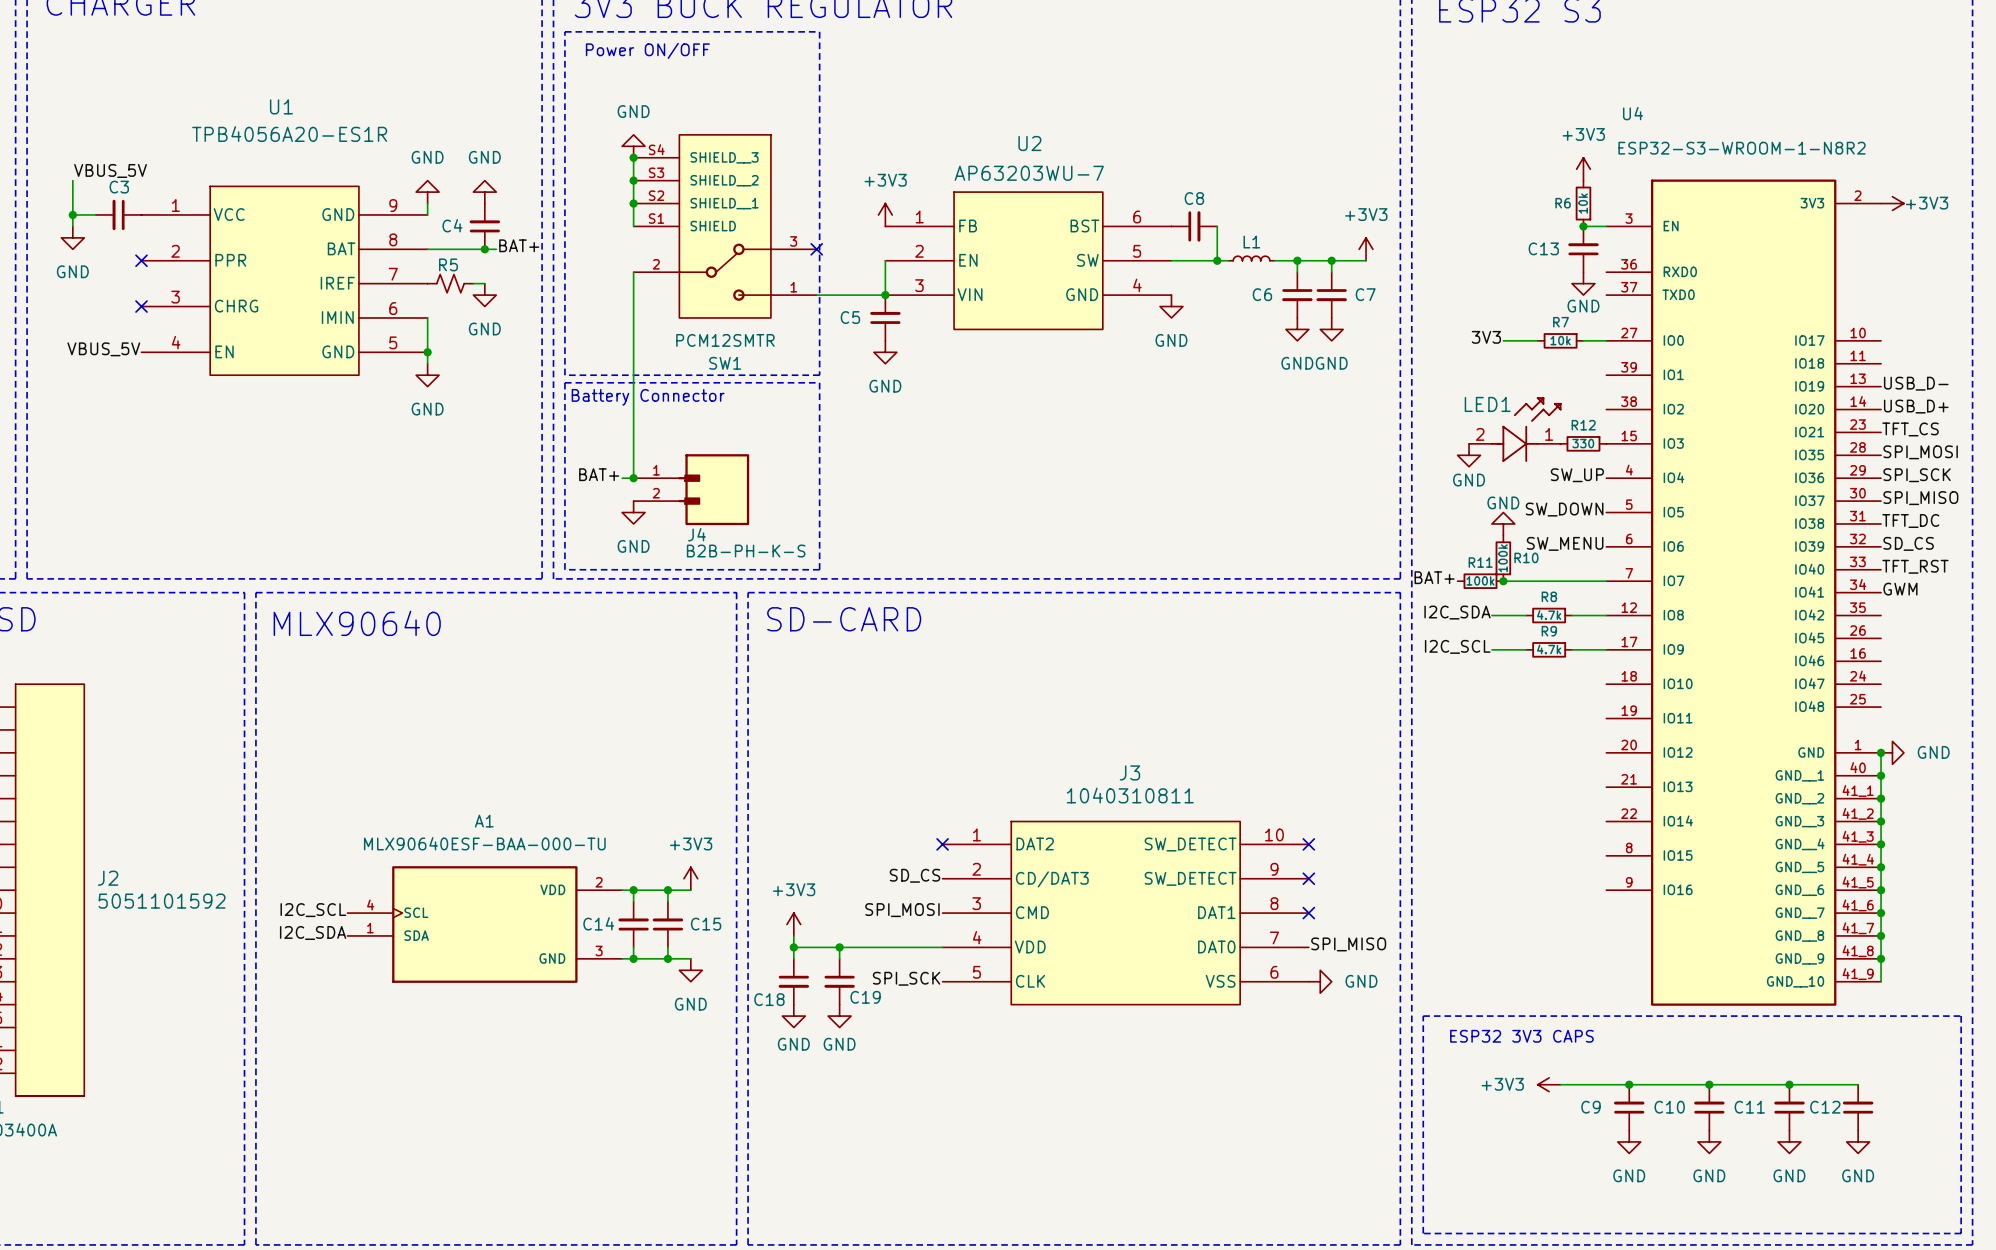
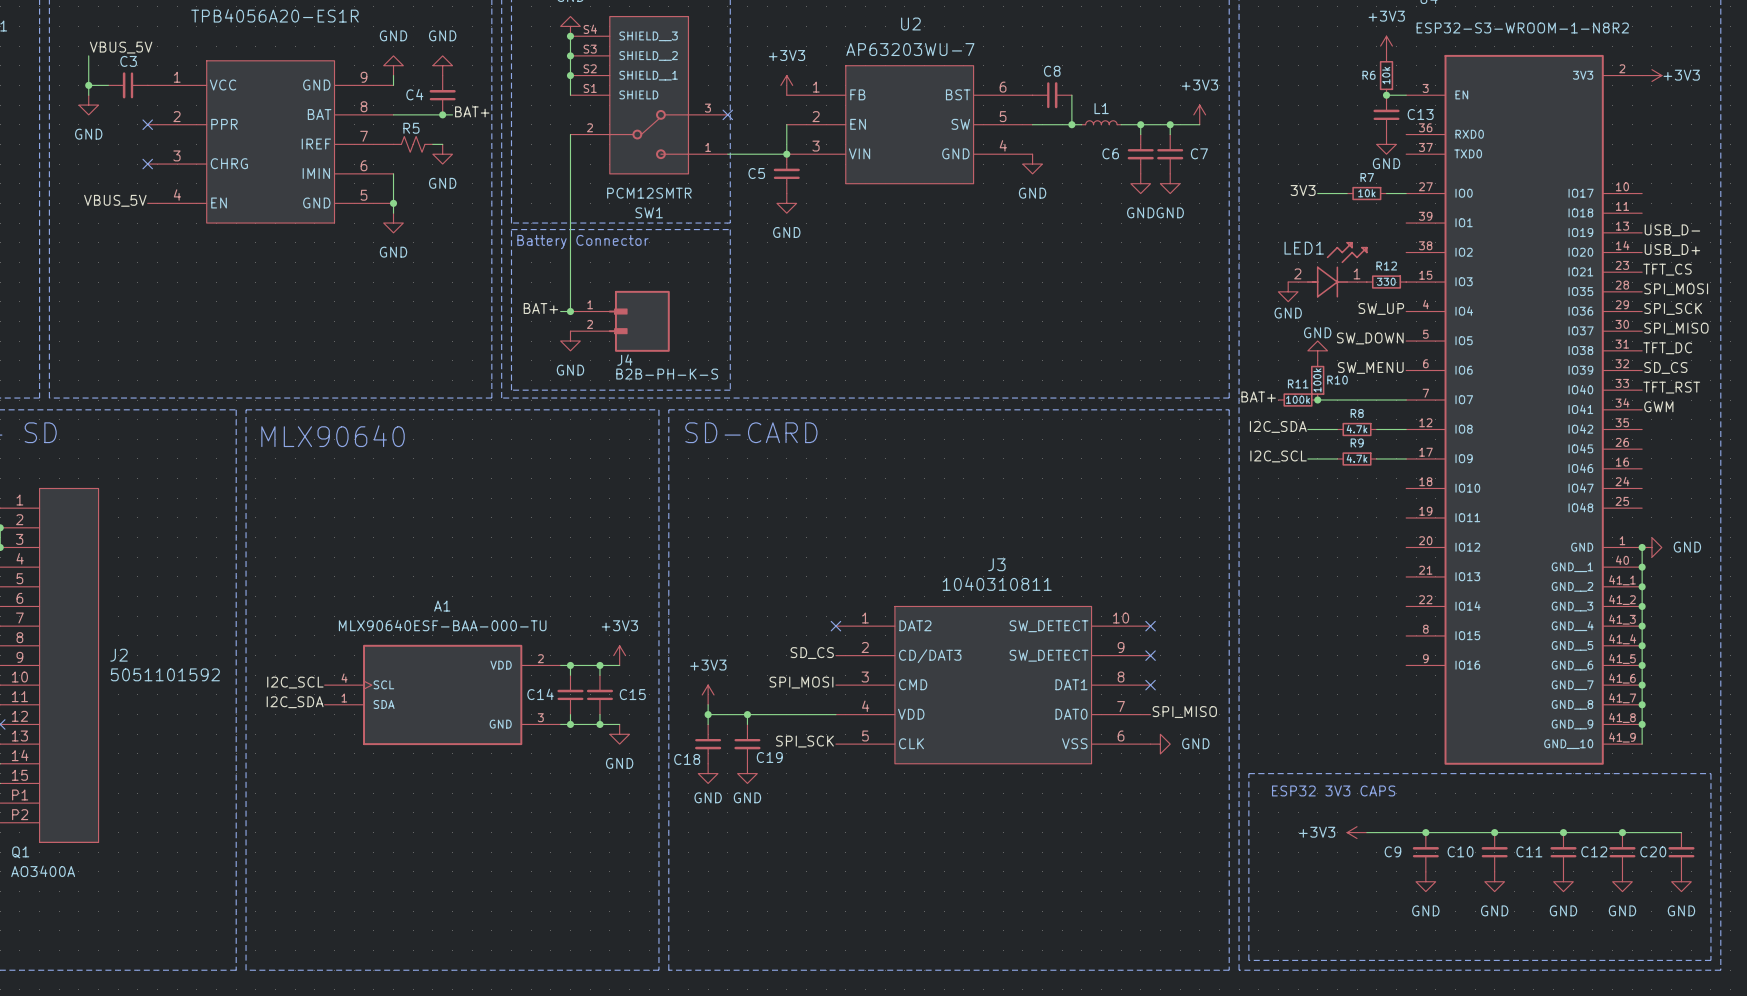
C13 name position: C13 (1543, 248) -> C13 (1420, 114)
wire: none -> (1622, 832) (1681, 832)
junction: none -> (1622, 832)
C20: none -> (1681, 852)
power symbol: none -> GND (1681, 881)

